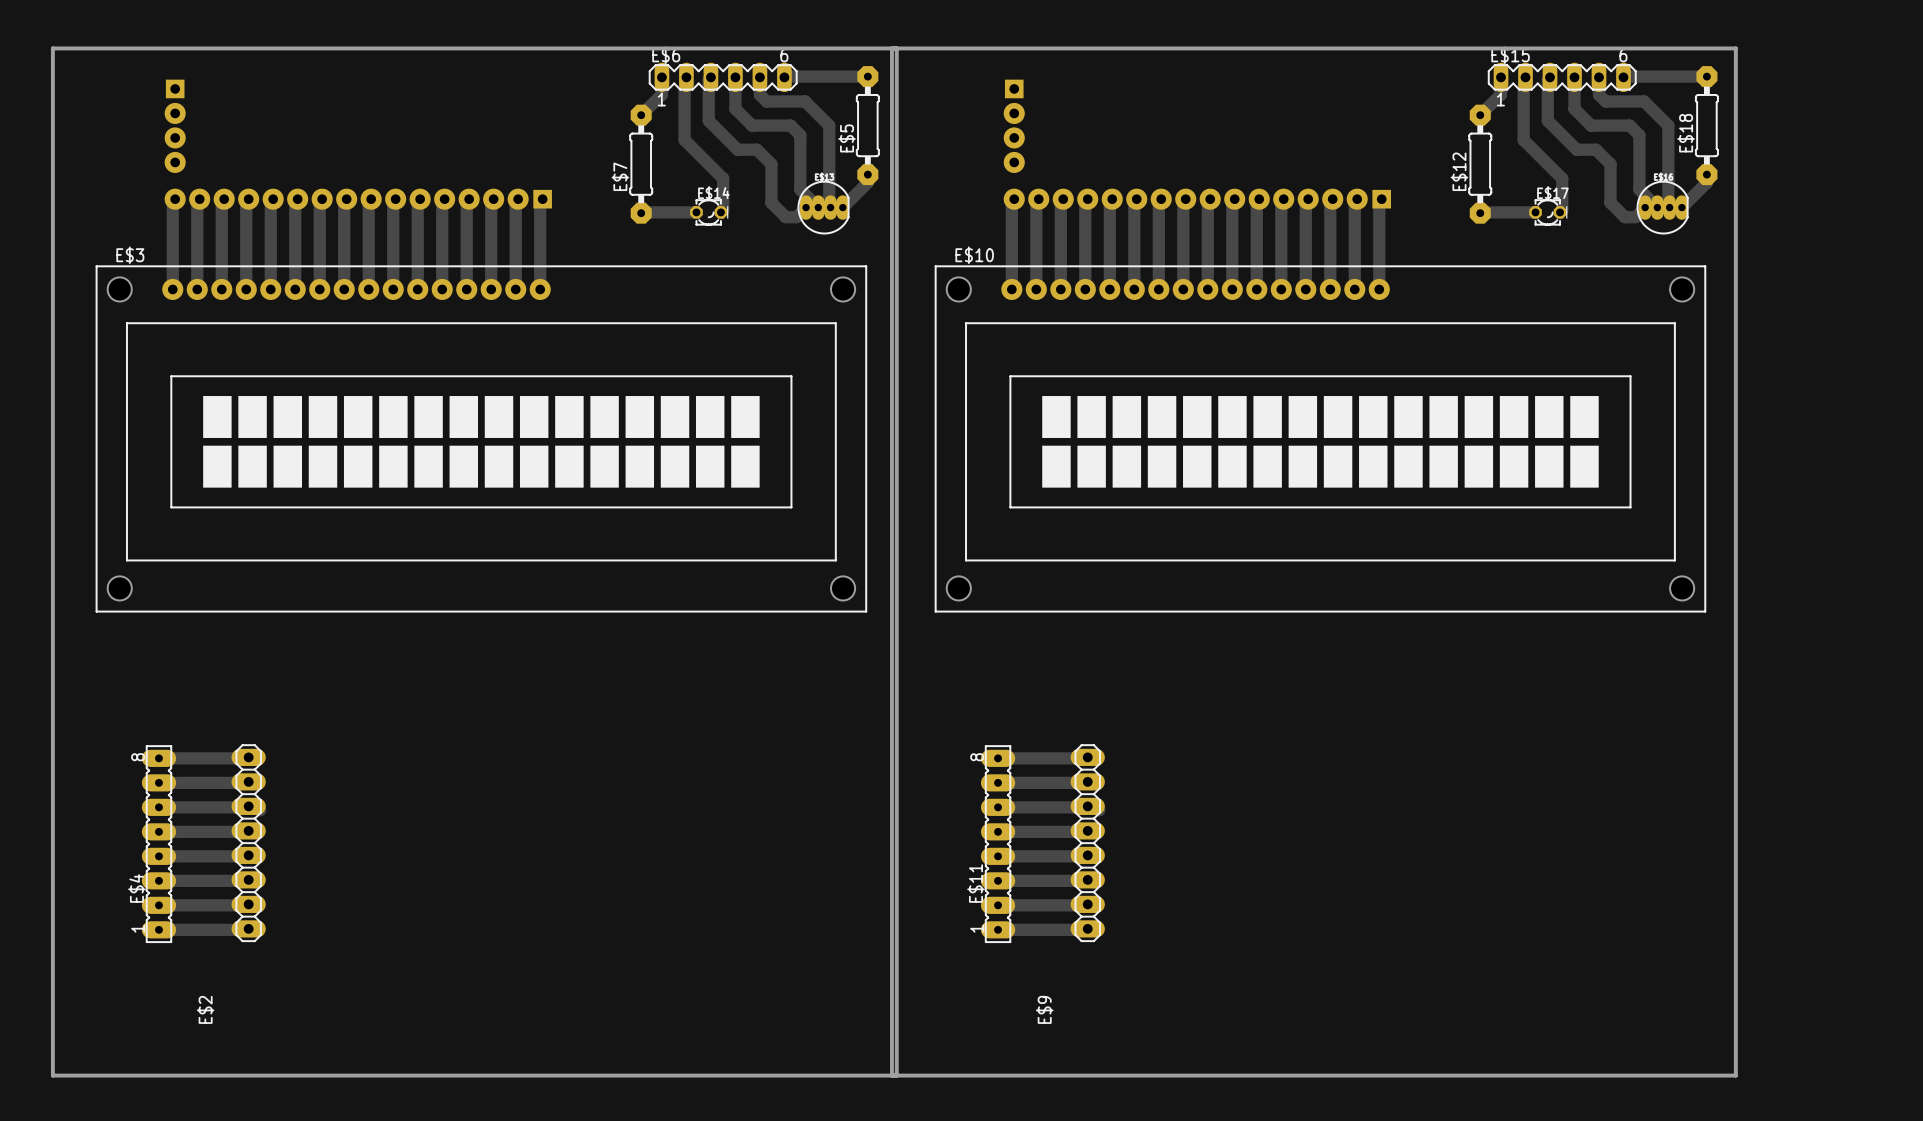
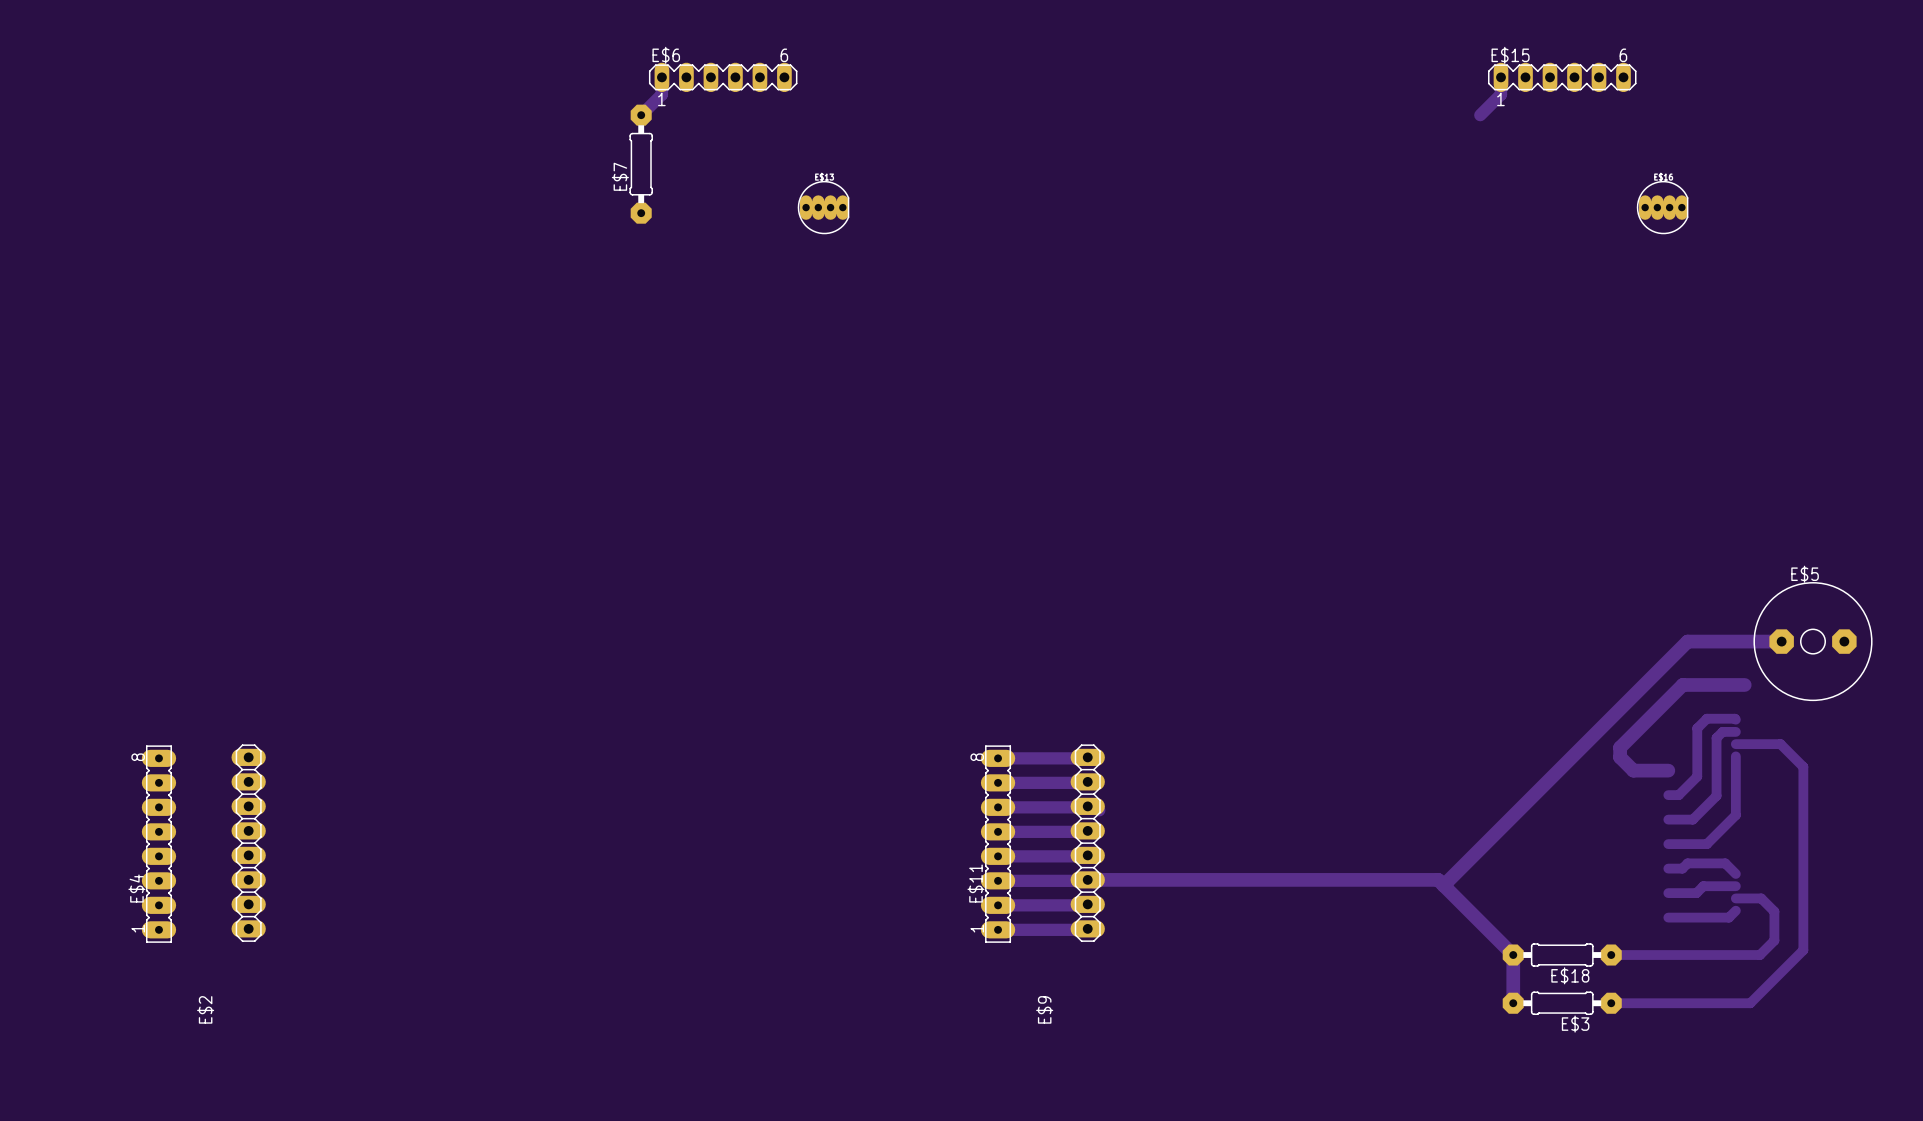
board edge: (52, 48) (52, 1075) (1735, 1075) (1735, 48) (52, 48) -> none
board edge: (891, 48) (891, 1075) -> none
board edge: (896, 48) (896, 1075) -> none
E$5 footprint: [856, 66, 880, 186] -> [1753, 582, 1873, 702]
track: (867, 76) (784, 77) -> none
track: (1706, 76) (1623, 77) -> none
track: (686, 77) (684, 87) (684, 140) (723, 178) (723, 210) (720, 212) -> none
track: (710, 77) (708, 79) (708, 120) (737, 149) (756, 149) (771, 164) (771, 202) (785, 217) (796, 217) (806, 207) -> none
track: (735, 77) (735, 108) (752, 125) (790, 125) (800, 135) (800, 189) (818, 207) -> none
track: (759, 77) (759, 94) (766, 101) (805, 101) (829, 125) (830, 207) -> none
track: (1525, 77) (1523, 87) (1523, 140) (1562, 178) (1562, 210) (1560, 212) -> none
track: (1550, 77) (1547, 79) (1547, 120) (1576, 149) (1596, 149) (1610, 164) (1610, 202) (1624, 217) (1635, 217) (1645, 207) -> none
track: (1574, 77) (1574, 108) (1591, 125) (1629, 125) (1639, 135) (1639, 189) (1657, 207) -> none
track: (1598, 77) (1598, 94) (1605, 101) (1644, 101) (1668, 125) (1669, 207) -> none
E$18 rotation: 0° (1706, 125) -> 90° clockwise (1562, 955)
E$18 position: (1706, 125) -> (1562, 955)
E$18 name position: E$18 (1686, 133) -> E$18 (1570, 975)
E$5 name position: E$5 (847, 138) -> E$5 (1805, 574)
part: (358, 144) -> none
part: (1197, 144) -> none
E$12: (1480, 164) -> none
track: (867, 174) (867, 182) (842, 207) -> none
track: (1706, 174) (1706, 182) (1681, 207) -> none
track: (175, 199) (172, 201) (172, 289) -> none
track: (199, 199) (197, 201) (197, 289) -> none
track: (224, 199) (221, 201) (221, 289) -> none
track: (248, 199) (246, 201) (246, 289) -> none
track: (273, 199) (270, 201) (270, 289) -> none
track: (297, 199) (295, 201) (295, 289) -> none
track: (322, 199) (319, 201) (319, 289) -> none
track: (346, 199) (344, 201) (344, 289) -> none
track: (371, 199) (368, 201) (368, 289) -> none
track: (395, 199) (393, 201) (393, 289) -> none
track: (420, 199) (417, 201) (417, 289) -> none
track: (444, 199) (442, 201) (442, 289) -> none
track: (469, 199) (466, 201) (466, 289) -> none
track: (493, 199) (491, 201) (491, 289) -> none
track: (518, 199) (515, 201) (515, 289) -> none
track: (542, 199) (540, 201) (540, 289) -> none
track: (1014, 199) (1011, 201) (1011, 289) -> none
track: (1038, 199) (1036, 201) (1036, 289) -> none
track: (1063, 199) (1060, 201) (1060, 289) -> none
track: (1087, 199) (1085, 201) (1085, 289) -> none
track: (1112, 199) (1109, 201) (1109, 289) -> none
track: (1136, 199) (1134, 201) (1134, 289) -> none
track: (1161, 199) (1158, 201) (1158, 289) -> none
track: (1185, 199) (1183, 201) (1183, 289) -> none
track: (1210, 199) (1207, 201) (1207, 289) -> none
track: (1234, 199) (1232, 201) (1232, 289) -> none
track: (1259, 199) (1256, 201) (1256, 289) -> none
track: (1283, 199) (1281, 201) (1281, 289) -> none
track: (1308, 199) (1305, 201) (1305, 289) -> none
track: (1332, 199) (1330, 201) (1330, 289) -> none
track: (1357, 199) (1354, 201) (1354, 289) -> none
track: (1381, 199) (1379, 201) (1379, 289) -> none
track: (696, 212) (641, 213) -> none
E$14: (709, 212) -> none
track: (1535, 212) (1480, 213) -> none
E$17: (1548, 212) -> none
E$3 name position: E$3 (130, 255) -> E$3 (1575, 1024)
E$3 footprint: [95, 265, 868, 613] -> [1502, 991, 1622, 1016]
E$10: (1320, 438) -> none
track: none -> (1781, 641) (1687, 641) (1443, 885)
track: none -> (1744, 684) (1682, 684) (1620, 747) (1620, 757) (1633, 770) (1668, 770)
track: none -> (1735, 719) (1706, 718) (1697, 728) (1697, 776) (1678, 795) (1668, 795)
track: none -> (1735, 731) (1722, 731) (1716, 738) (1716, 795) (1692, 819) (1668, 819)
track: none -> (1735, 744) (1780, 744) (1803, 766) (1803, 950) (1750, 1003) (1611, 1003)
track: none -> (1735, 756) (1735, 815) (1706, 844) (1668, 844)
track: (255, 757) (158, 758) -> none
track: (255, 781) (158, 782) -> none
track: (158, 807) (257, 807) (260, 810) -> none
track: (248, 830) (158, 831) -> none
track: (158, 856) (248, 856) -> none
track: none -> (1668, 868) (1682, 868) (1687, 863) (1725, 863) (1735, 873)
track: none -> (1087, 879) (1438, 879) (1513, 955) (1513, 1003)
track: (158, 880) (253, 880) (255, 882) -> none
track: none -> (1735, 886) (1703, 886) (1696, 893) (1668, 893)
track: none -> (1735, 898) (1761, 898) (1774, 911) (1774, 940) (1759, 955) (1611, 955)
track: (158, 905) (255, 906) -> none
track: none -> (1735, 910) (1728, 917) (1668, 917)
track: (158, 929) (255, 930) -> none

